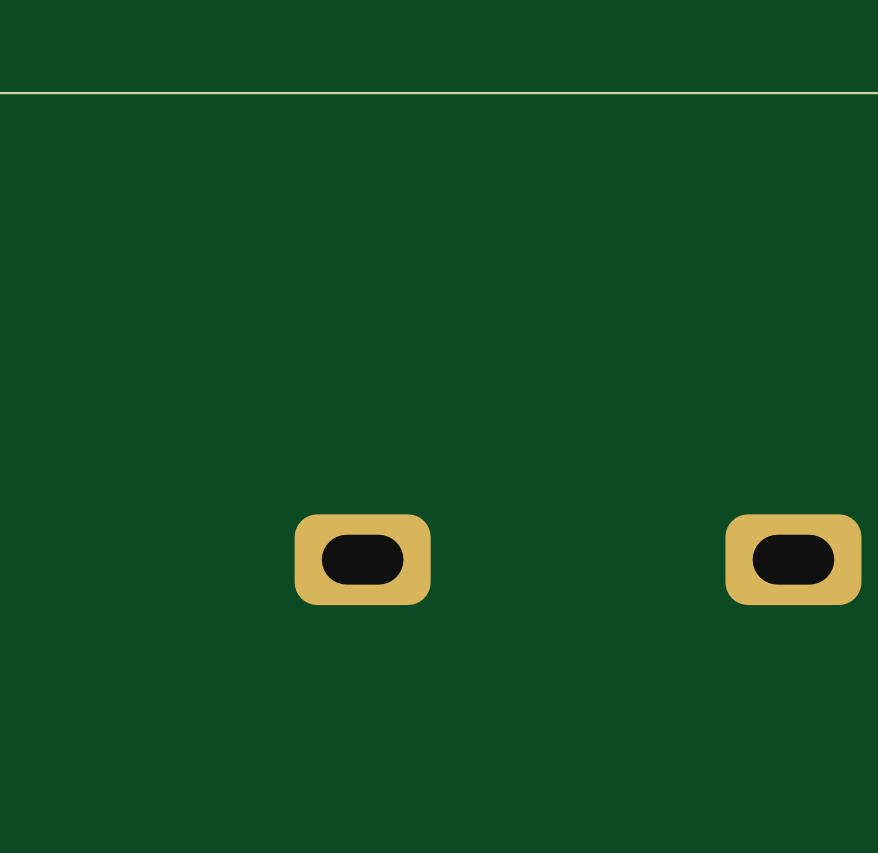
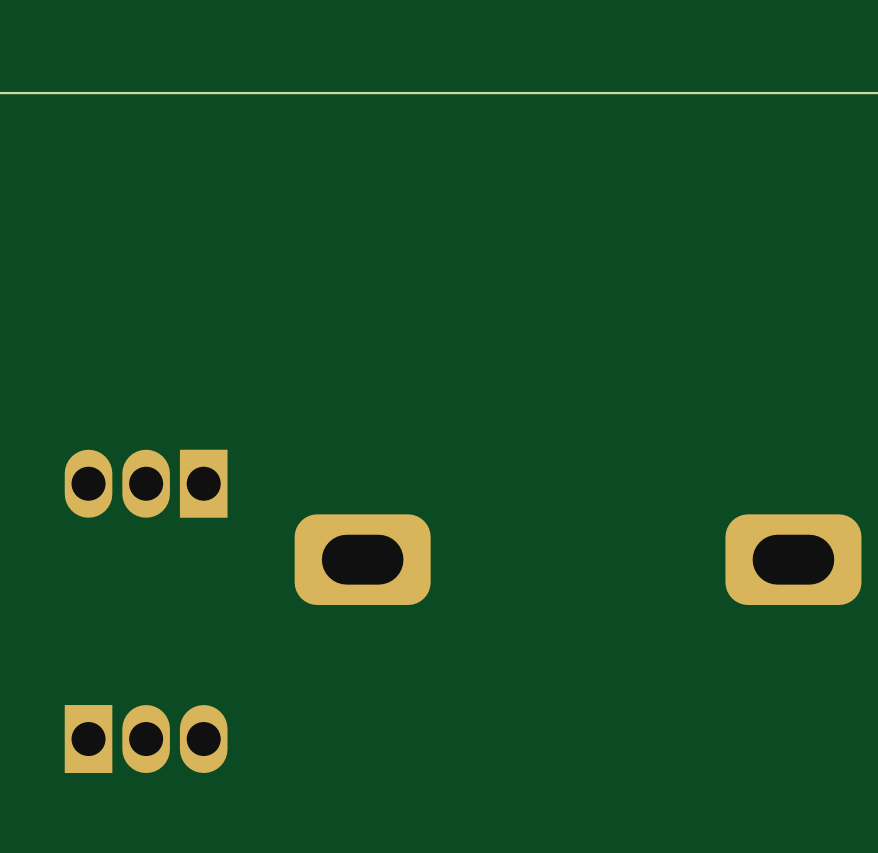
part: none -> (146, 483)
part: none -> (146, 739)

